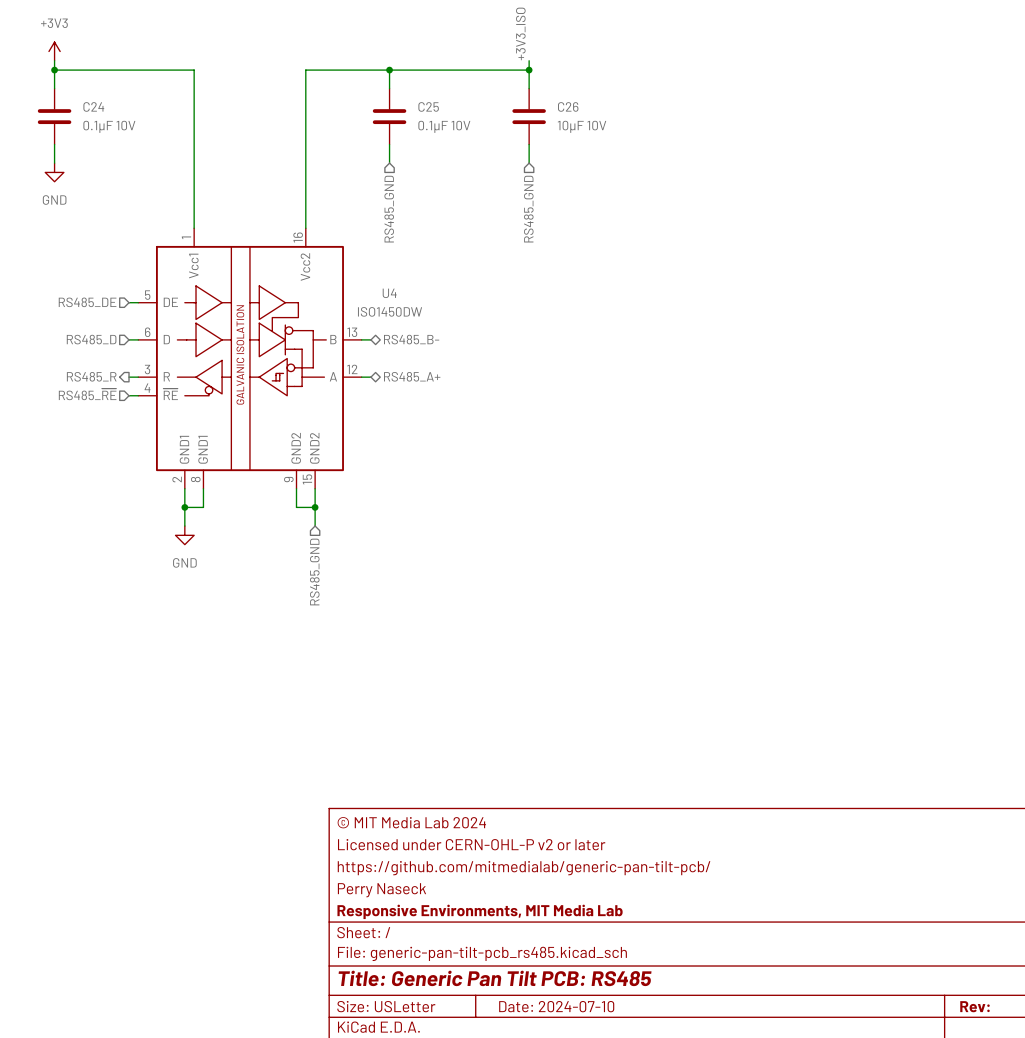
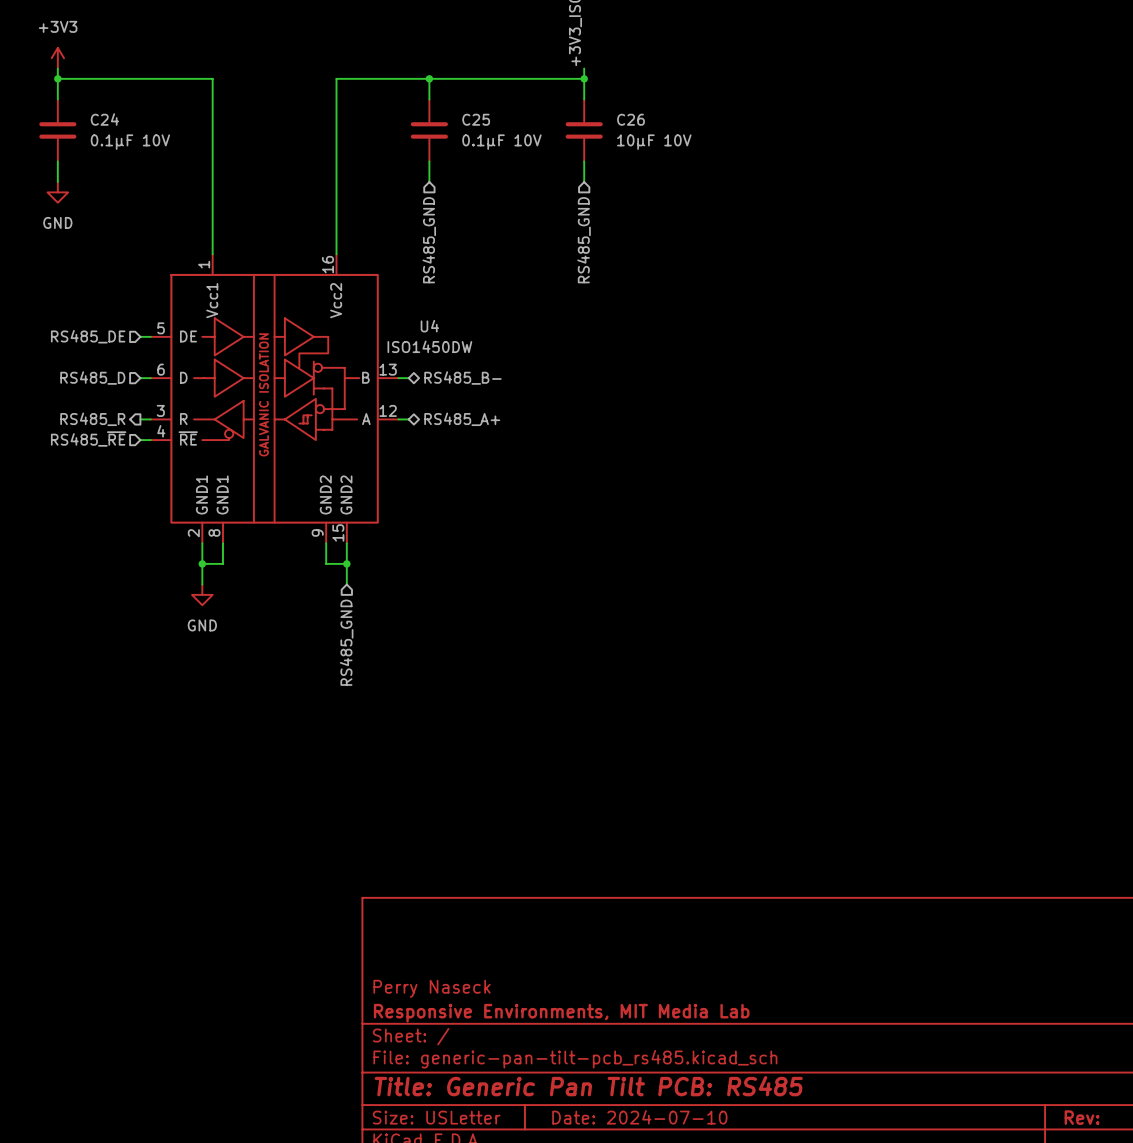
title block: © MIT Media Lab 2024 (411, 822) -> none
title block: Licensed under CERN-OHL-P v2 or later (471, 844) -> none
title block: https://github.com/mitmedialab/generic-pan-tilt-pcb/ (524, 868) -> none

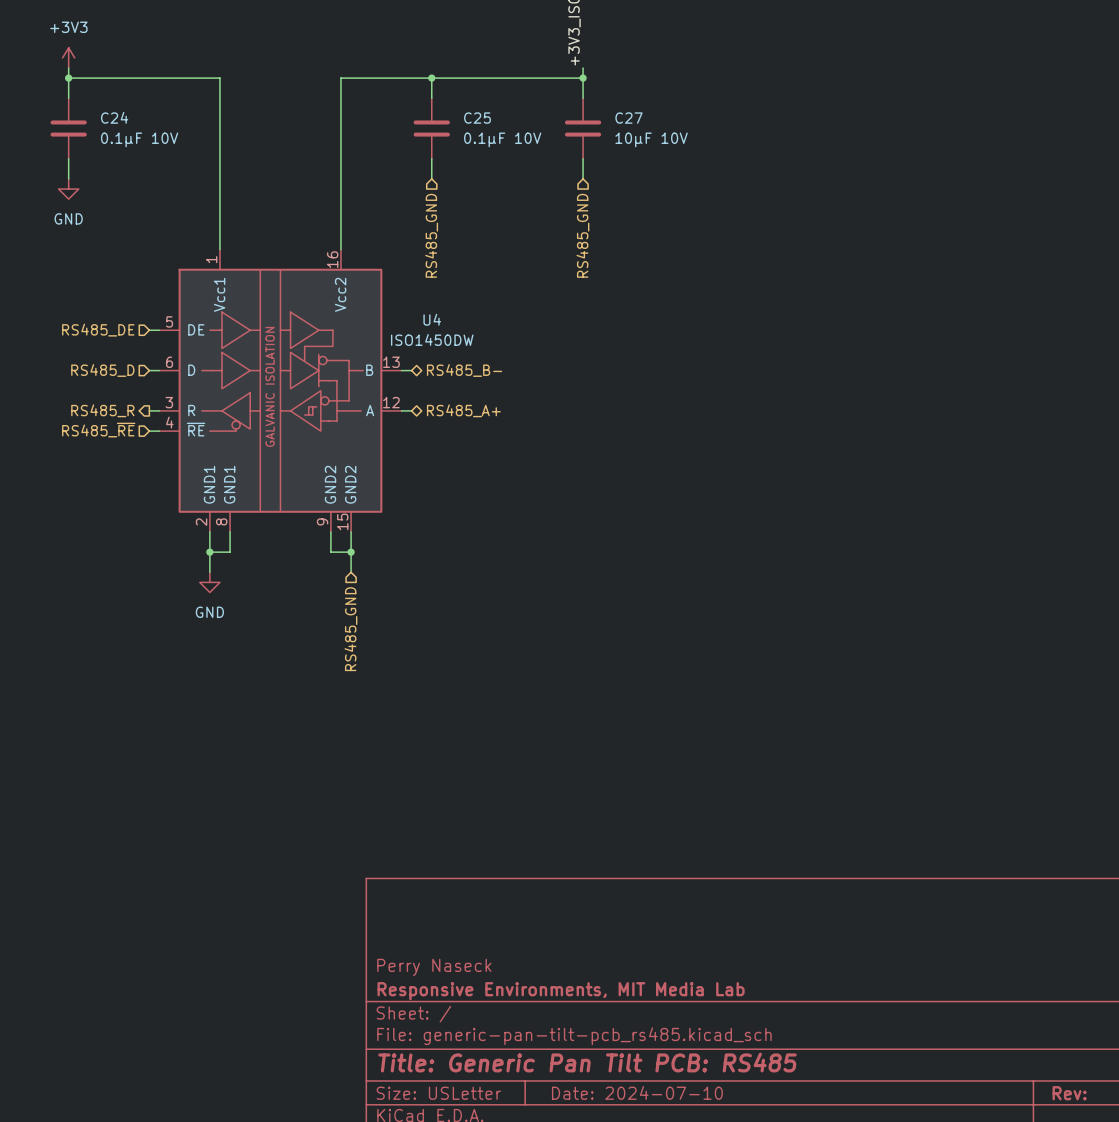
C26 name: C26 (630, 119) -> C27 (629, 118)

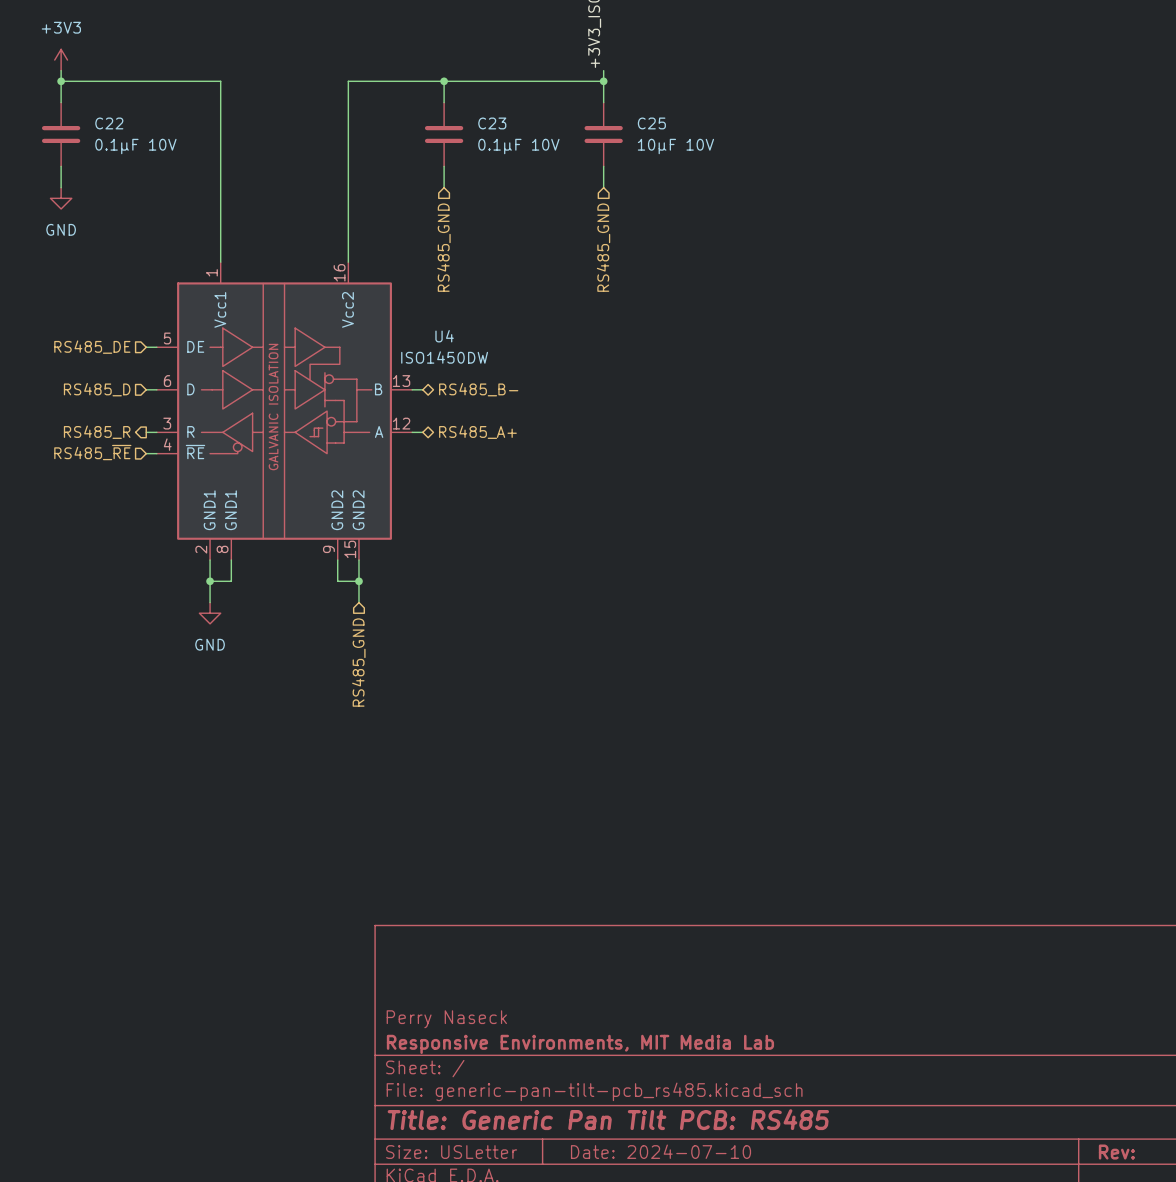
C24 name: C24 (114, 117) -> C22 (109, 123)
C25 name: C25 (477, 118) -> C23 (492, 123)
C27 name: C27 (629, 118) -> C25 (651, 123)

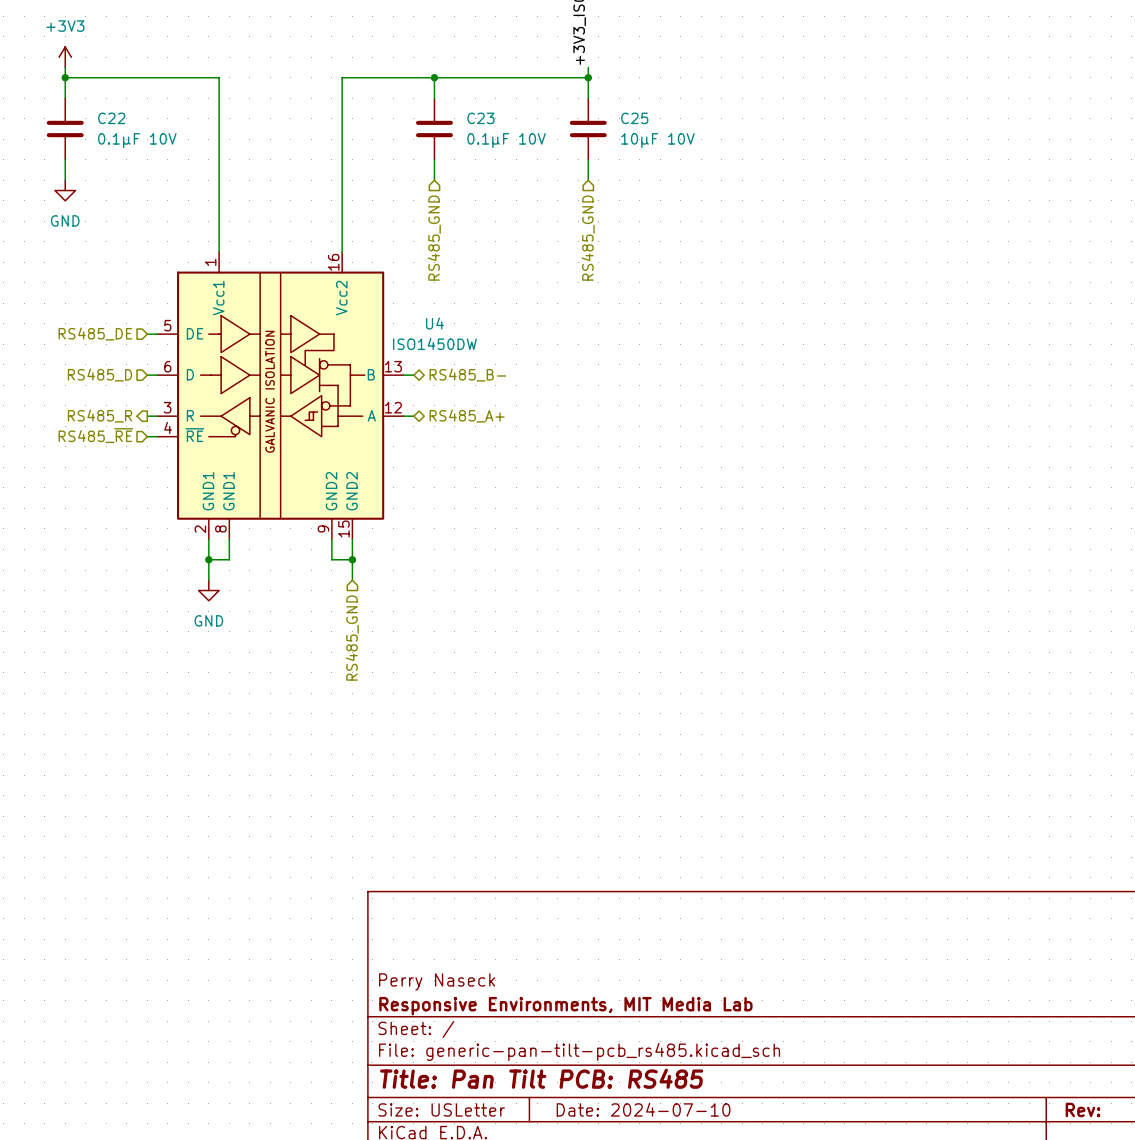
title block: Title: Generic Pan Tilt PCB: RS485 (608, 1119) -> Title: Pan Tilt PCB: RS485 (541, 1078)

